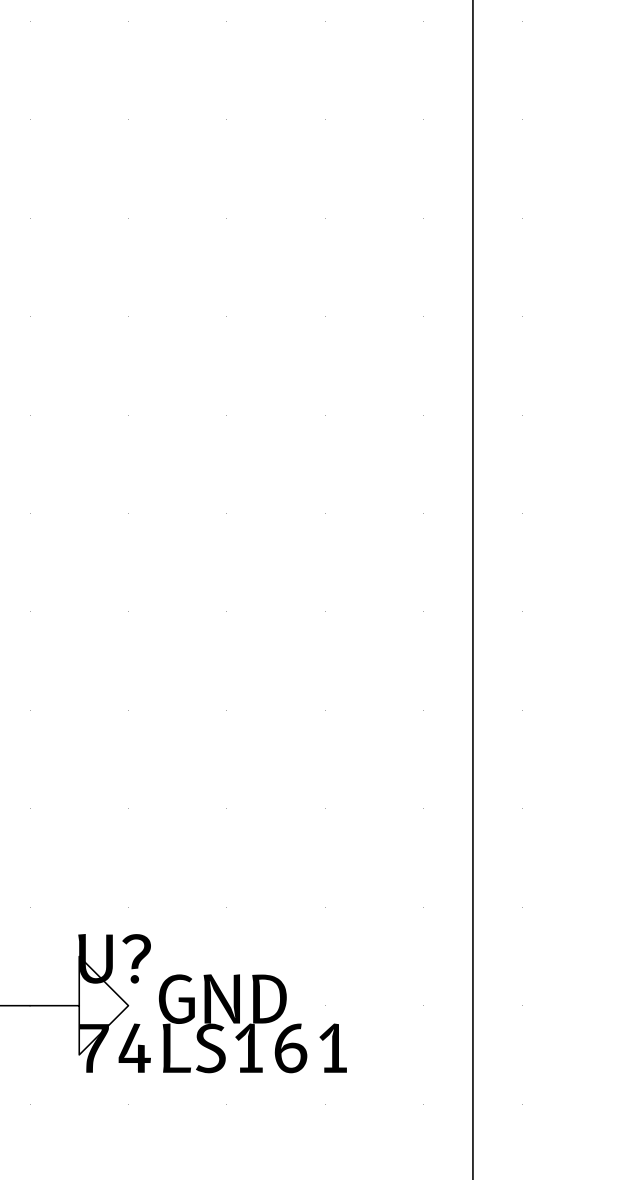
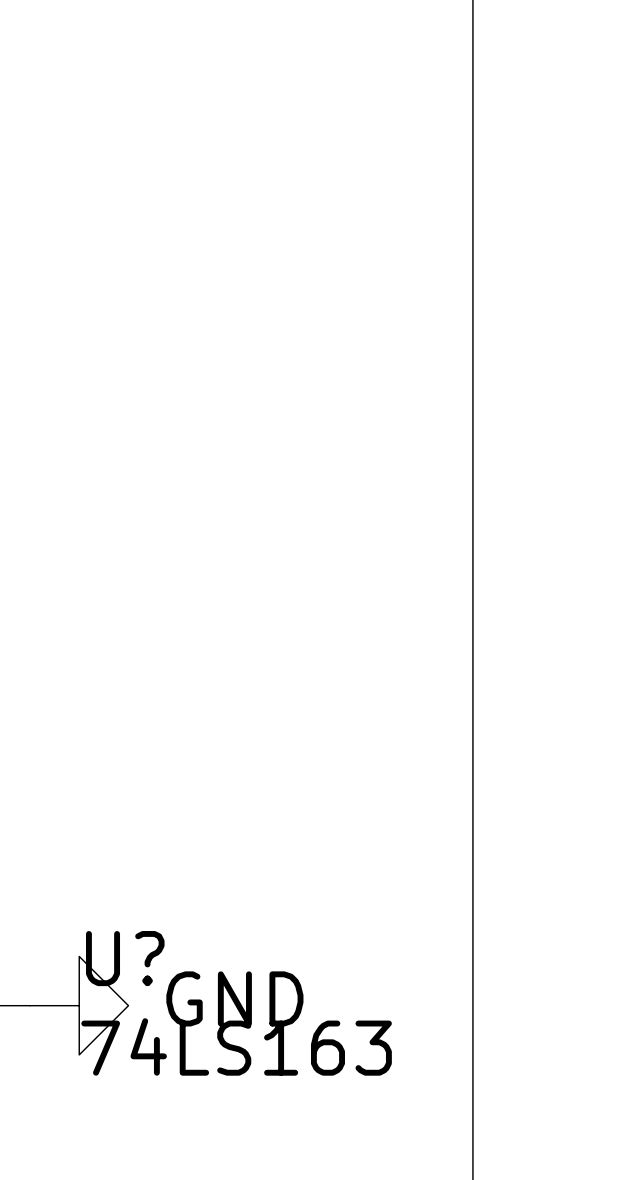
U? value: 74LS161 (213, 1048) -> 74LS163 (236, 1046)

